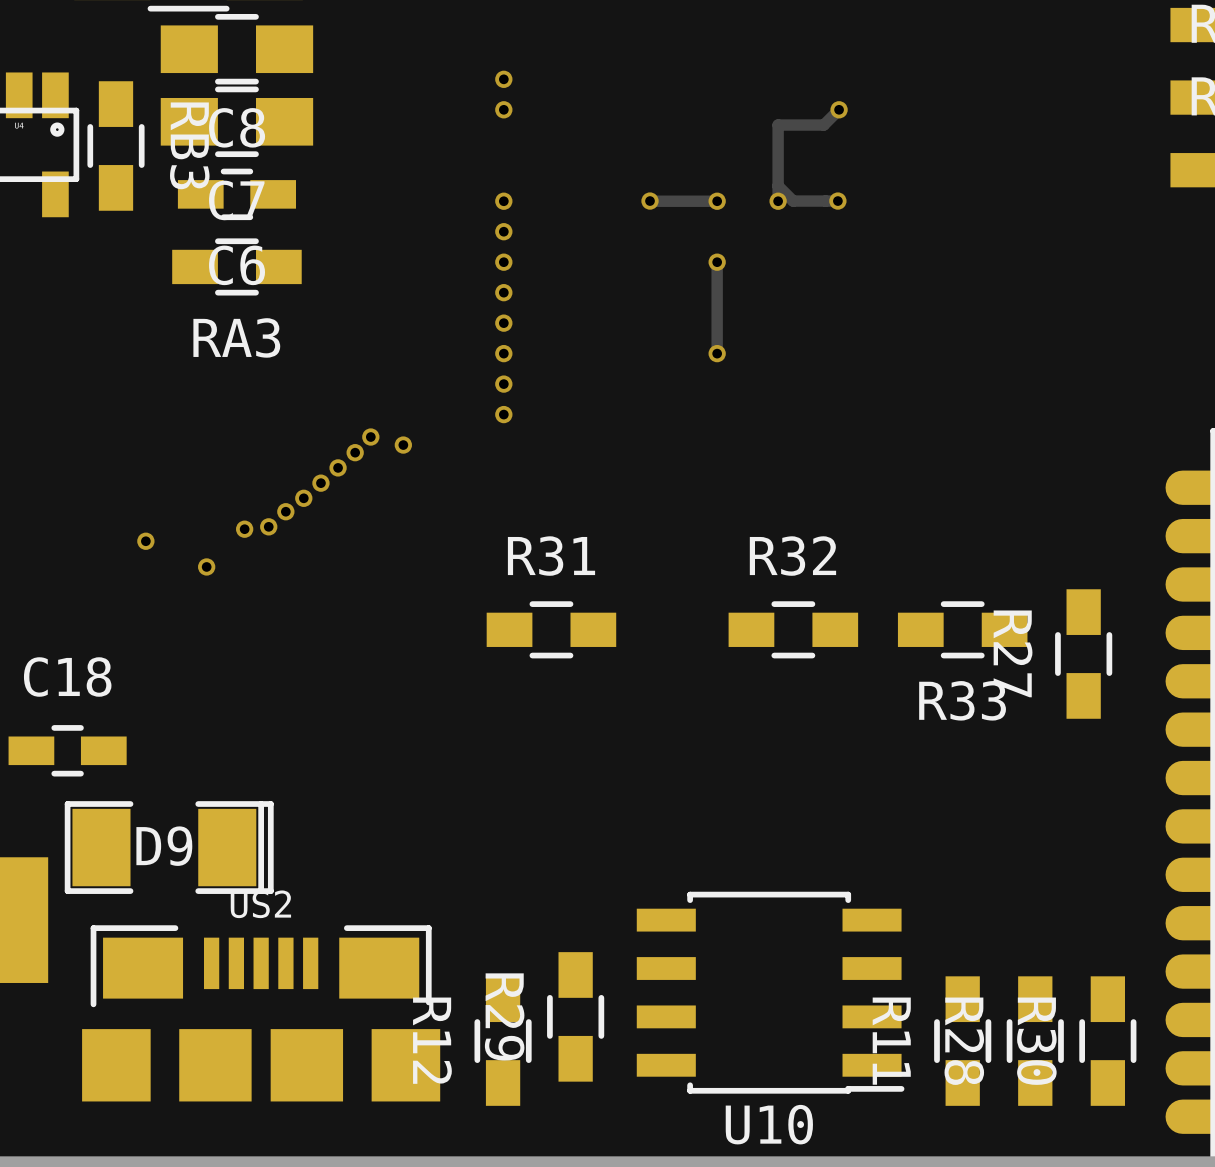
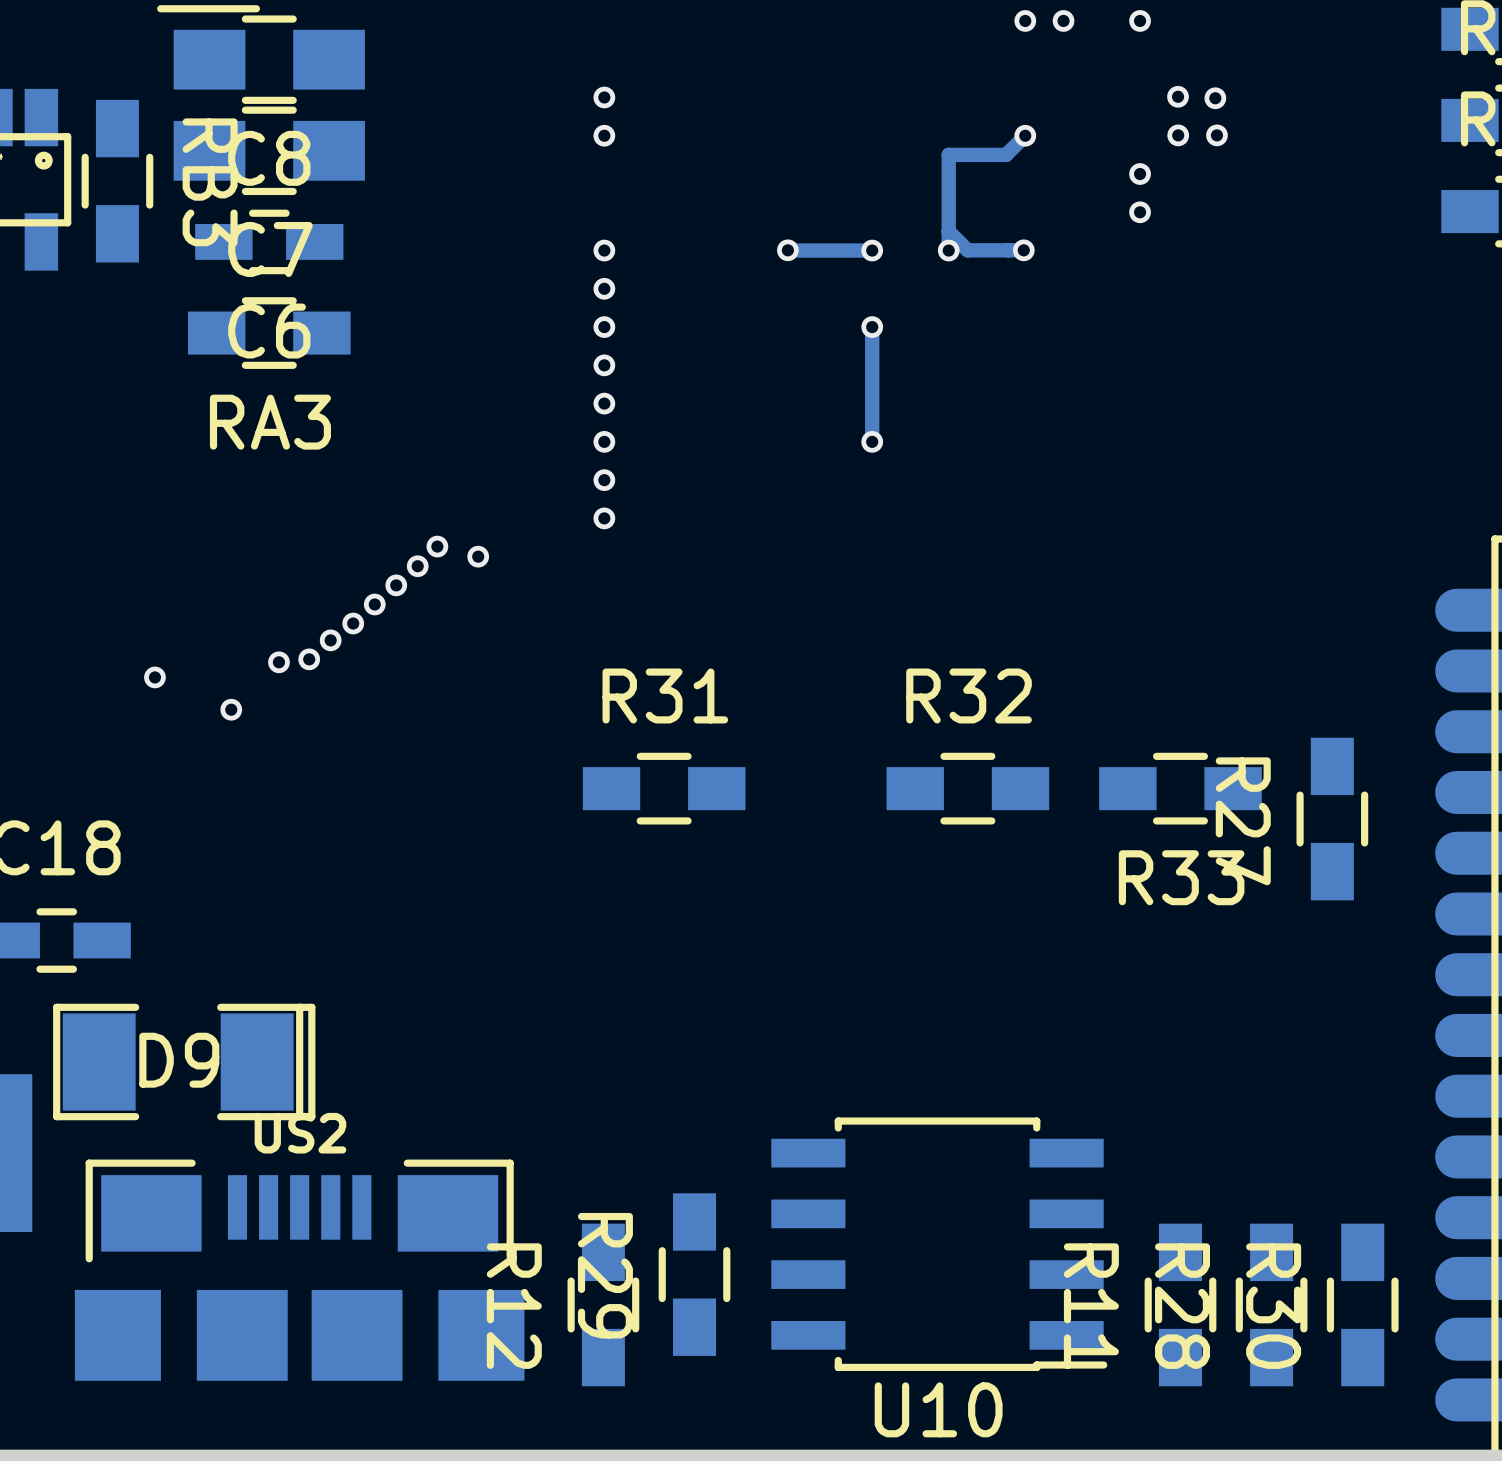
via: none -> (1025, 20)
via: none -> (1063, 20)
via: none -> (1140, 20)
via: none -> (1178, 96)
via: none -> (1215, 98)
via: none -> (1178, 135)
via: none -> (1216, 135)
via: none -> (1140, 174)
via: none -> (1140, 212)

